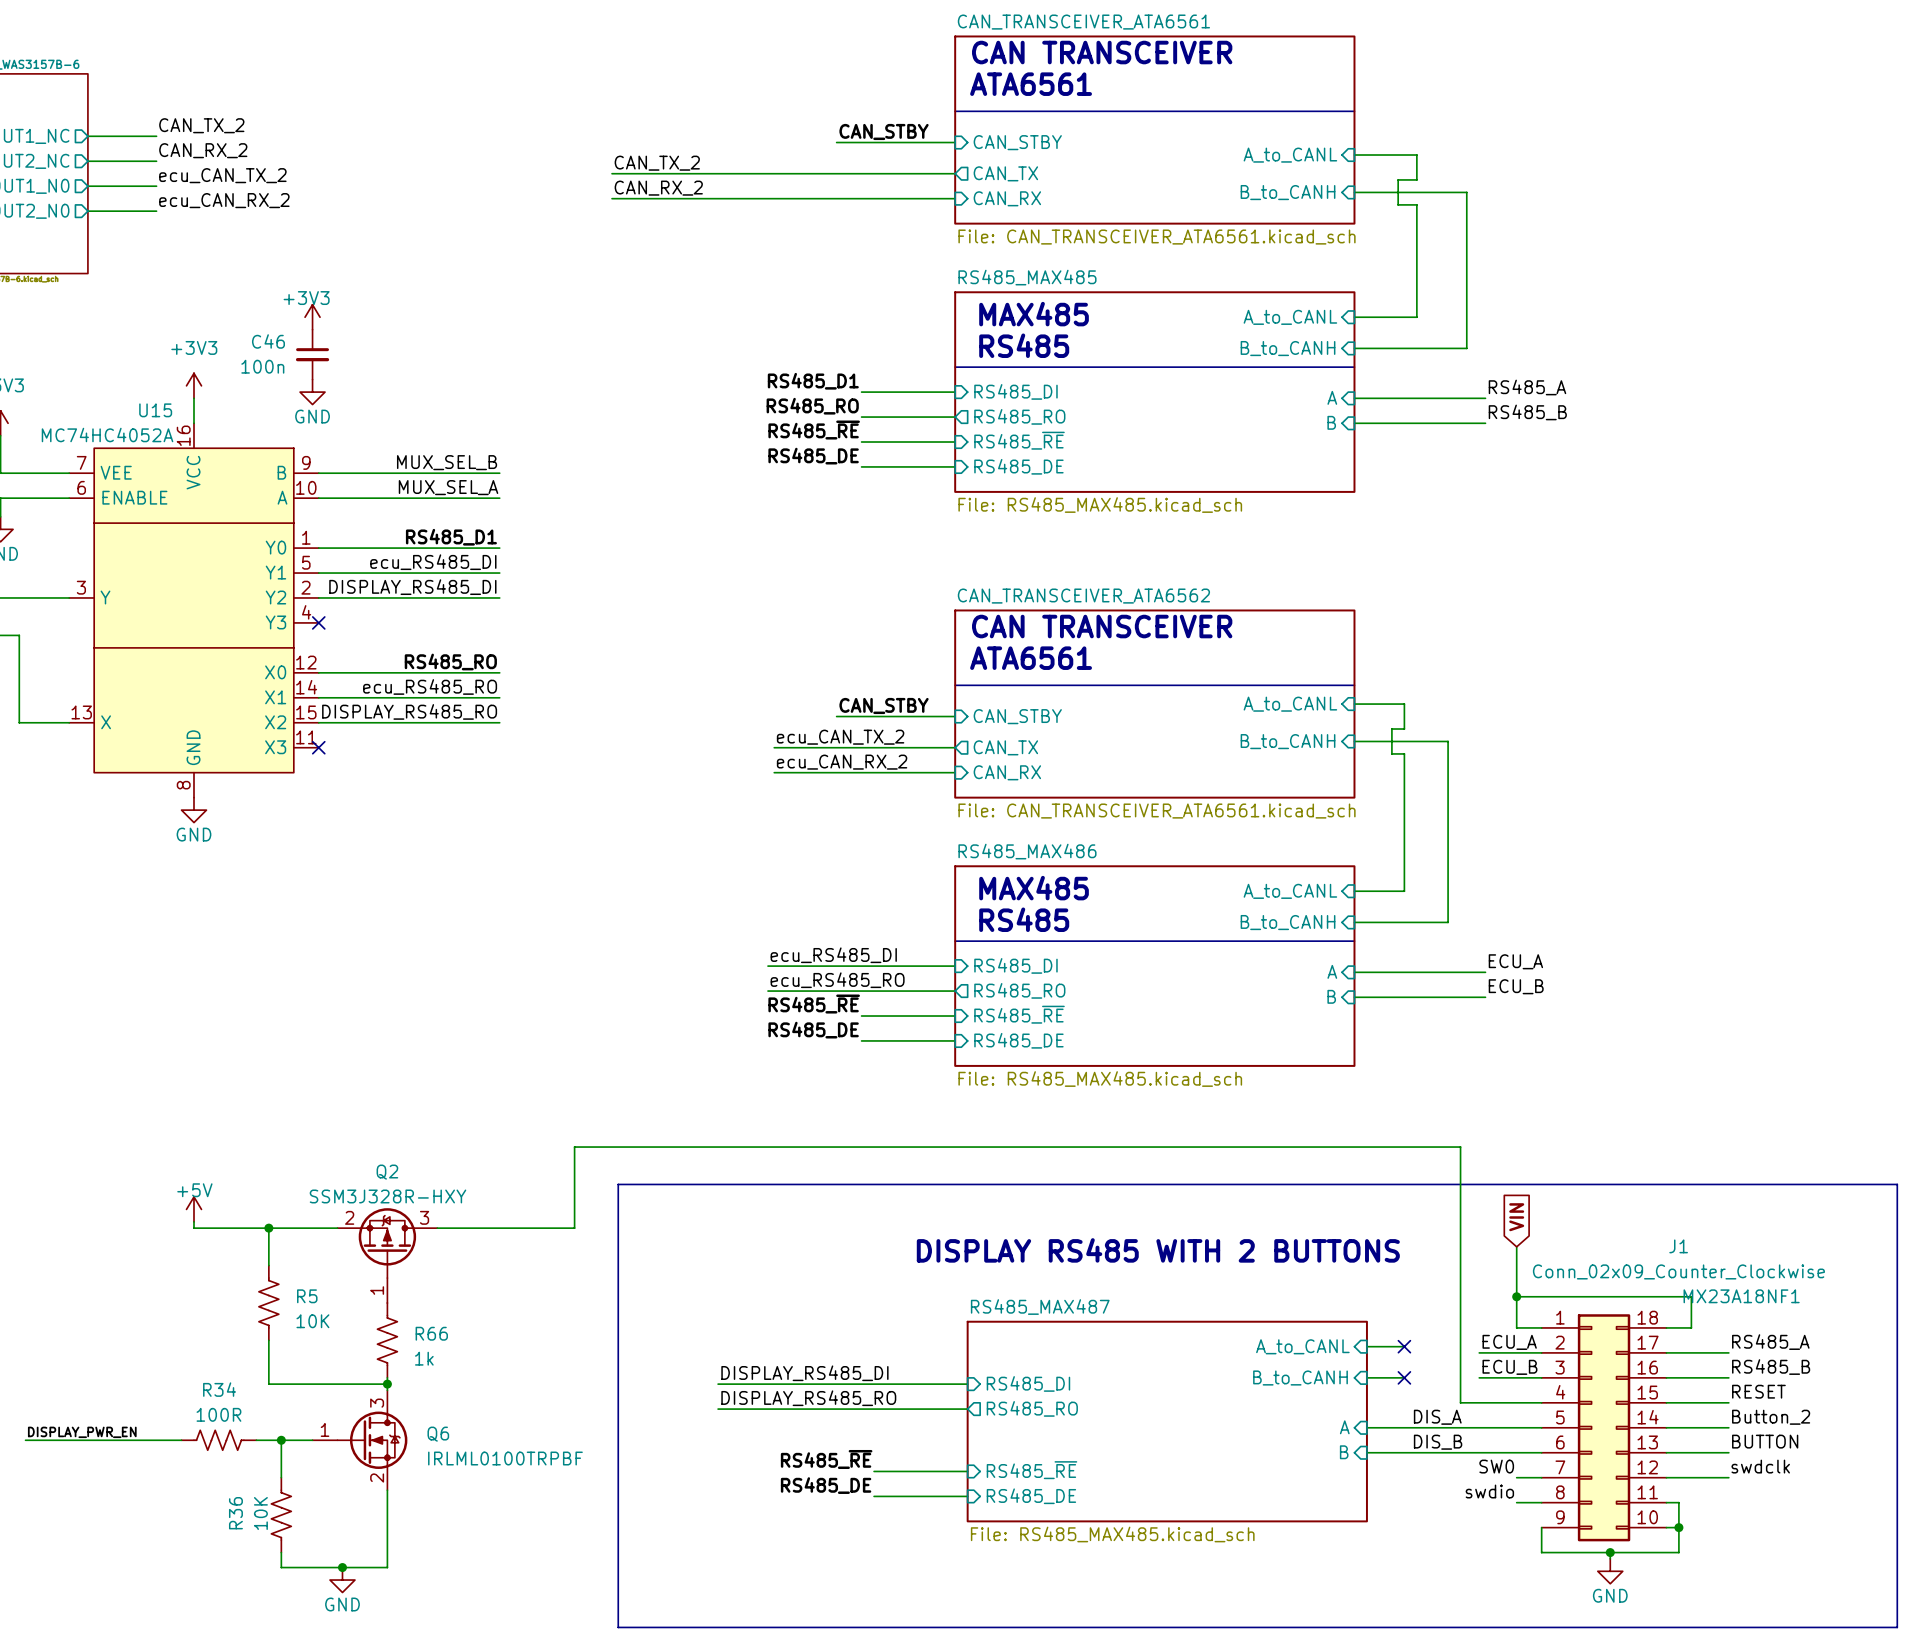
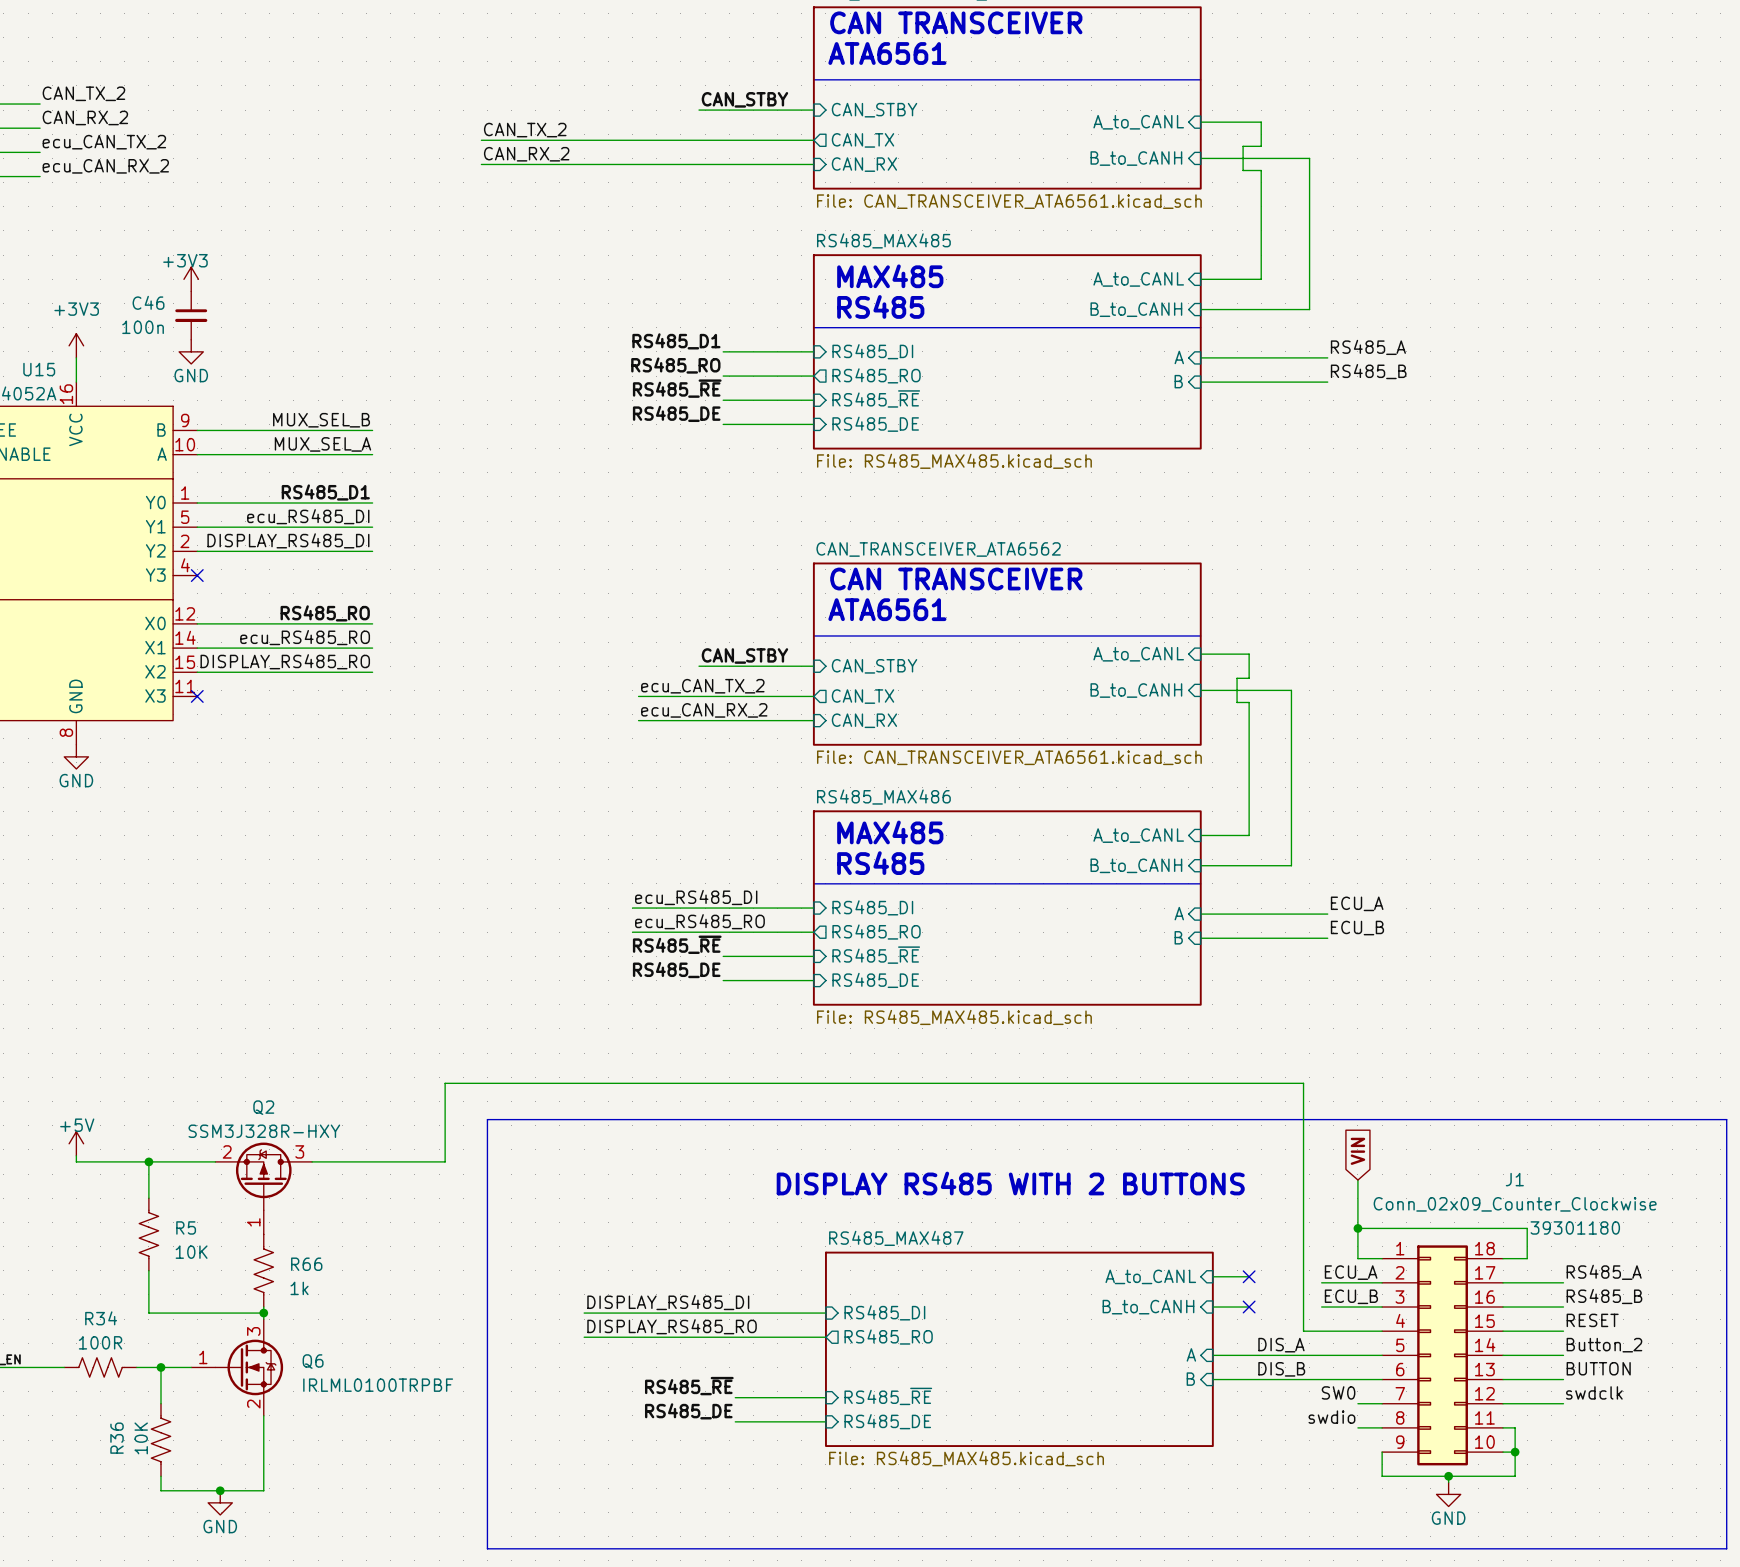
J1 text: MX23A18NF1 (1741, 1296) -> 39301180 (1575, 1227)

